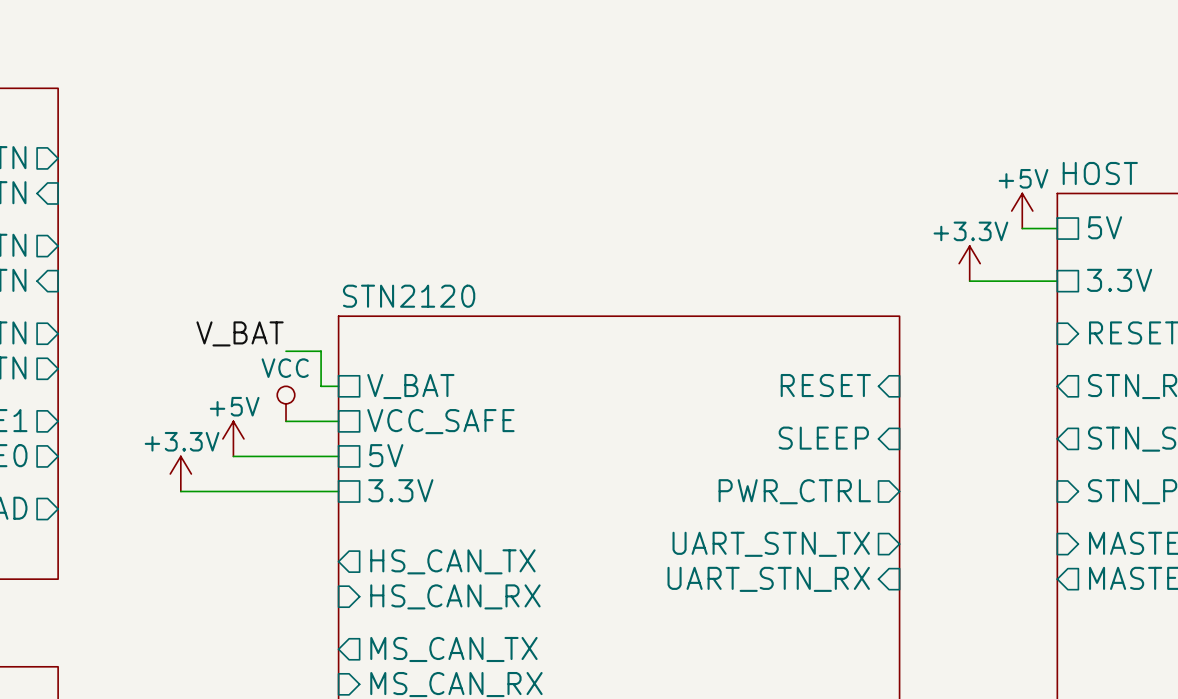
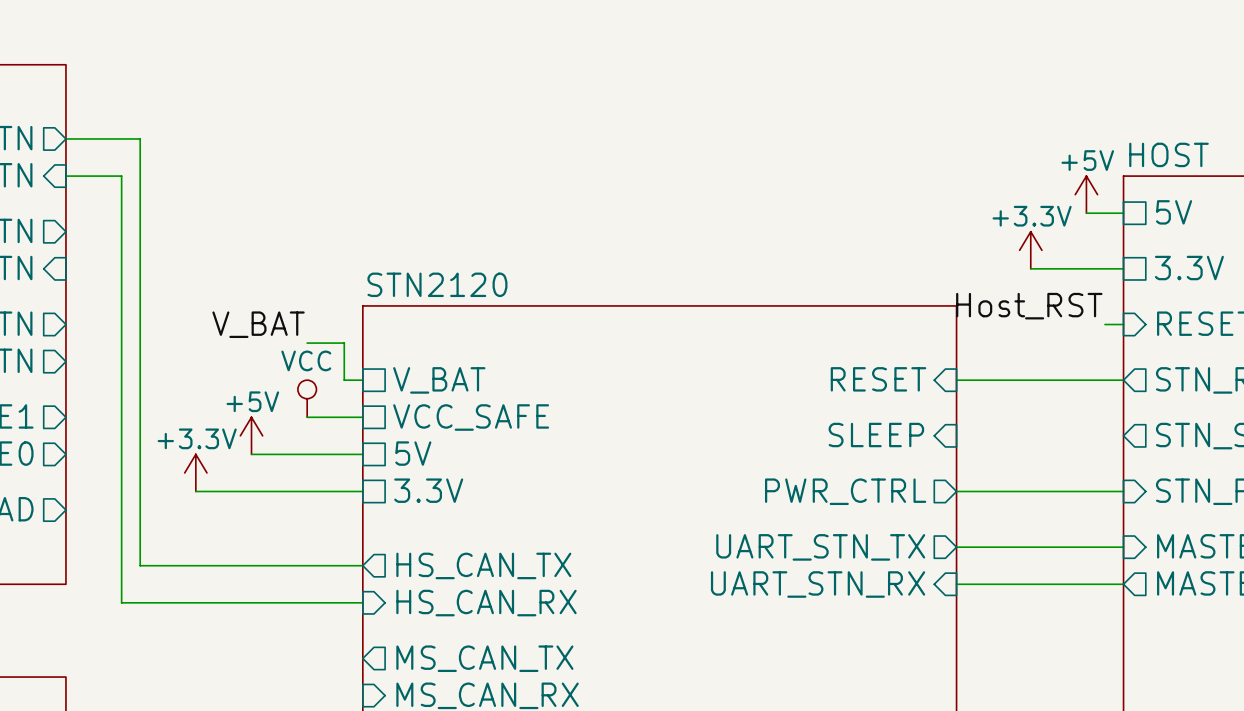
wire: none -> (65, 138) (140, 138) (140, 565) (362, 565)
wire: none -> (65, 176) (121, 176) (121, 602) (362, 602)
label: none -> Host_RST (1029, 306)
wire: none -> (1104, 324) (1123, 324)
wire: none -> (956, 380) (1123, 380)
wire: none -> (956, 491) (1123, 491)
wire: none -> (956, 547) (1123, 547)
wire: none -> (956, 584) (1123, 584)

